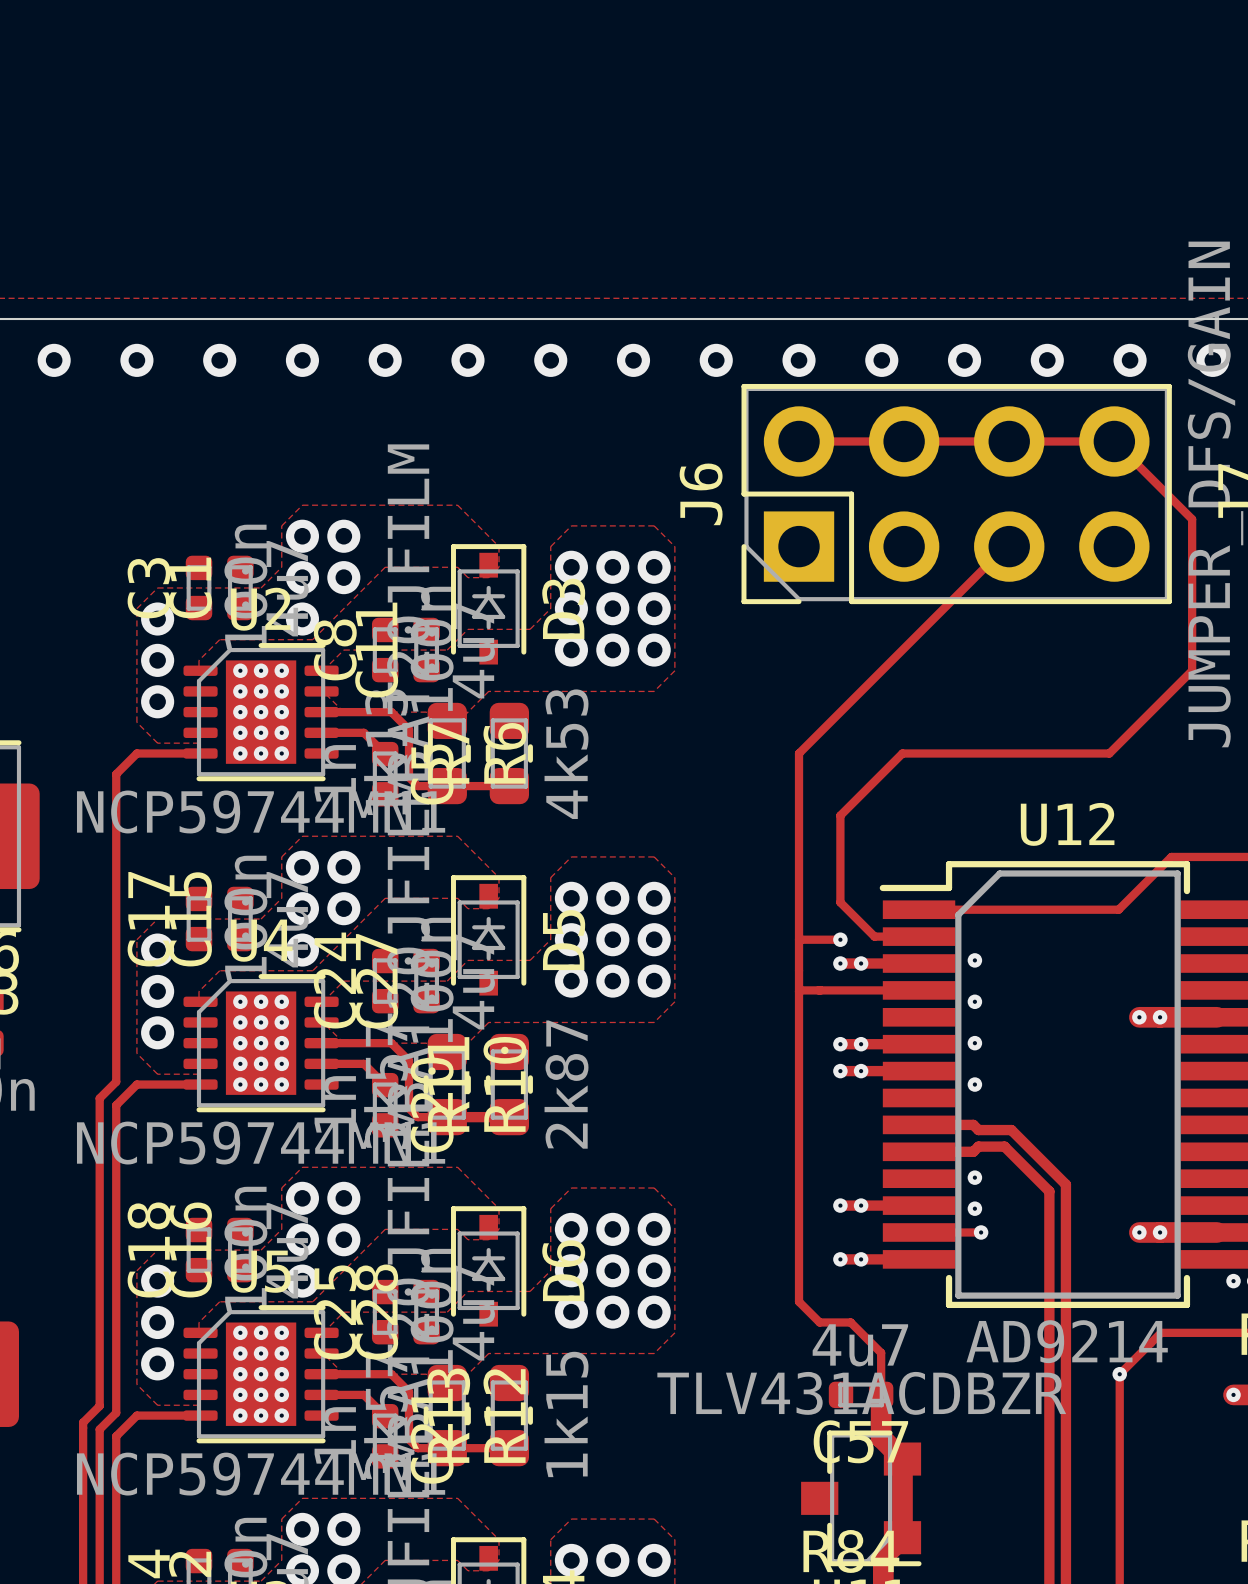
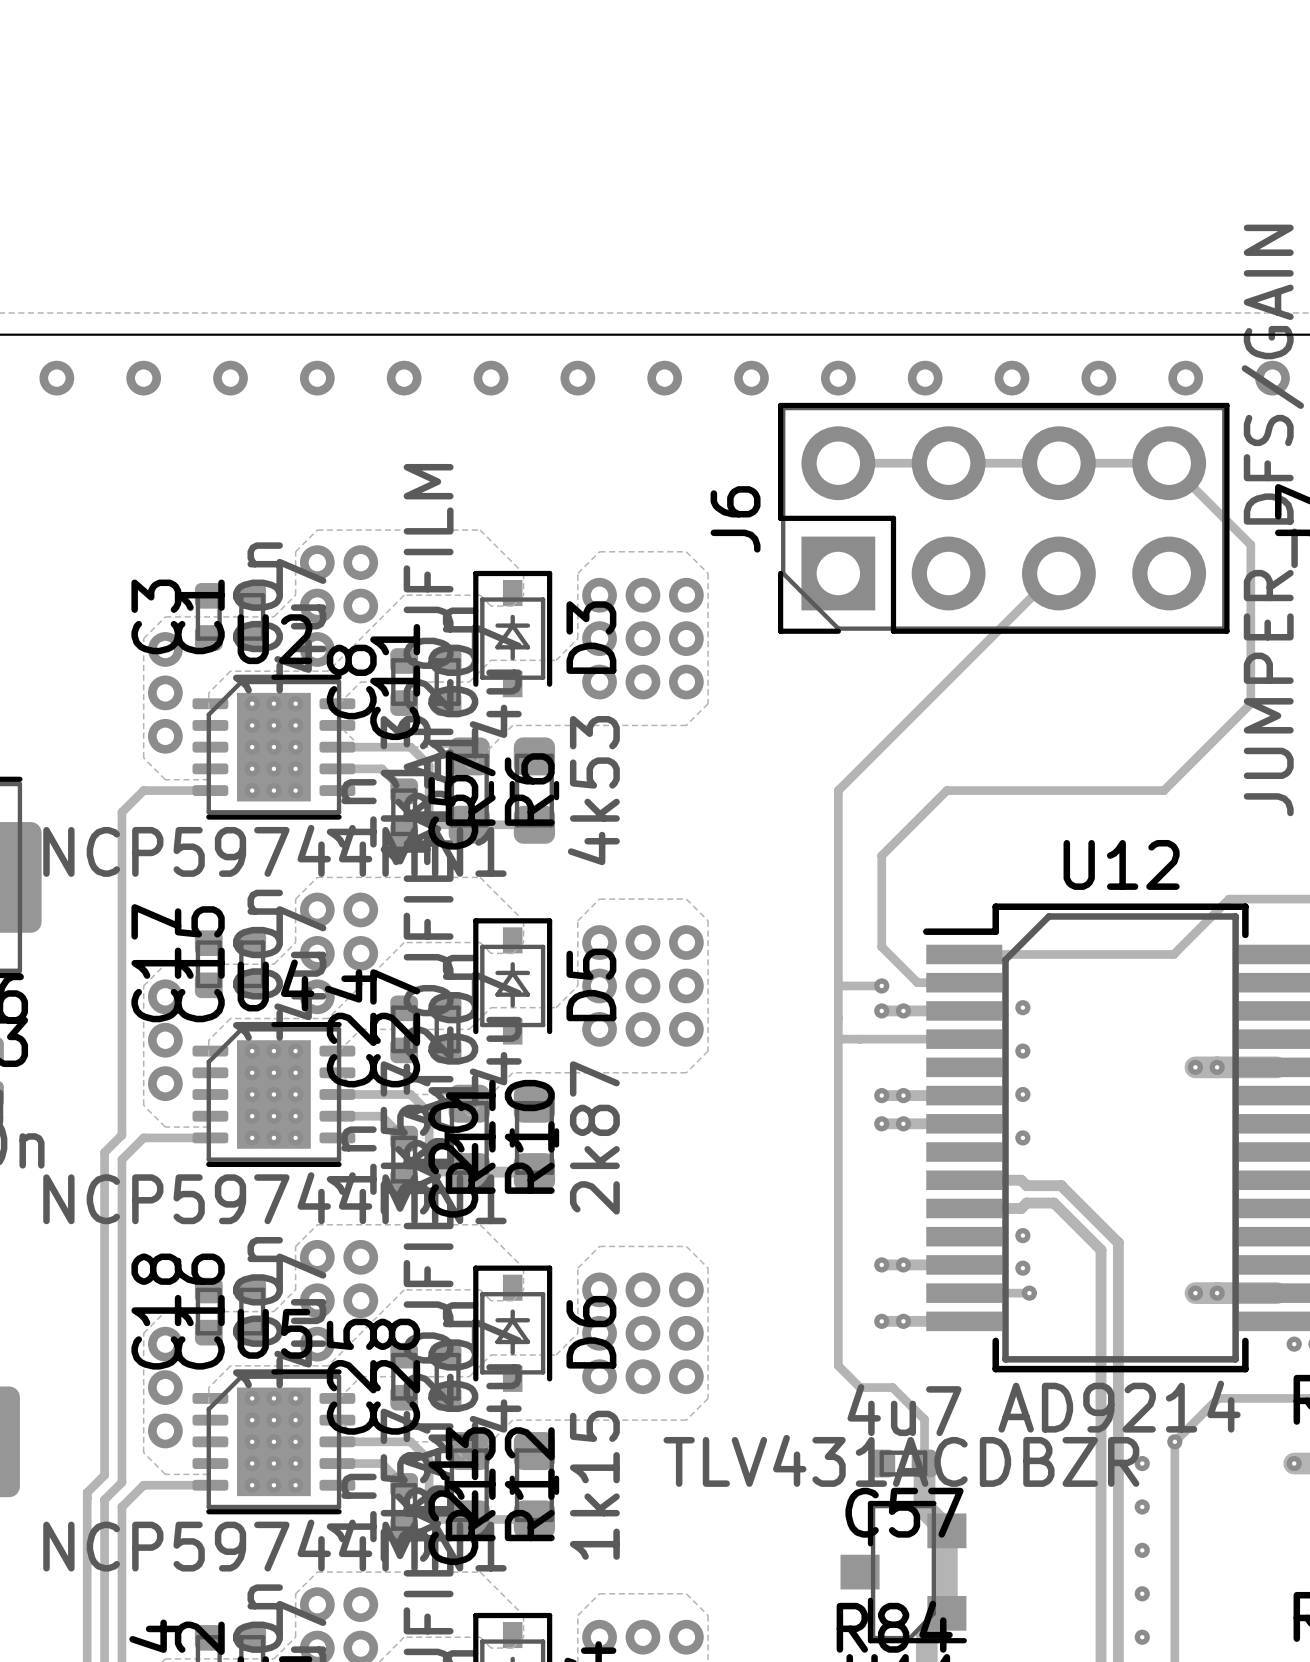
via: none -> (1142, 1463)
via: none -> (1142, 1506)
via: none -> (1142, 1550)
via: none -> (1142, 1593)
via: none -> (1142, 1637)

